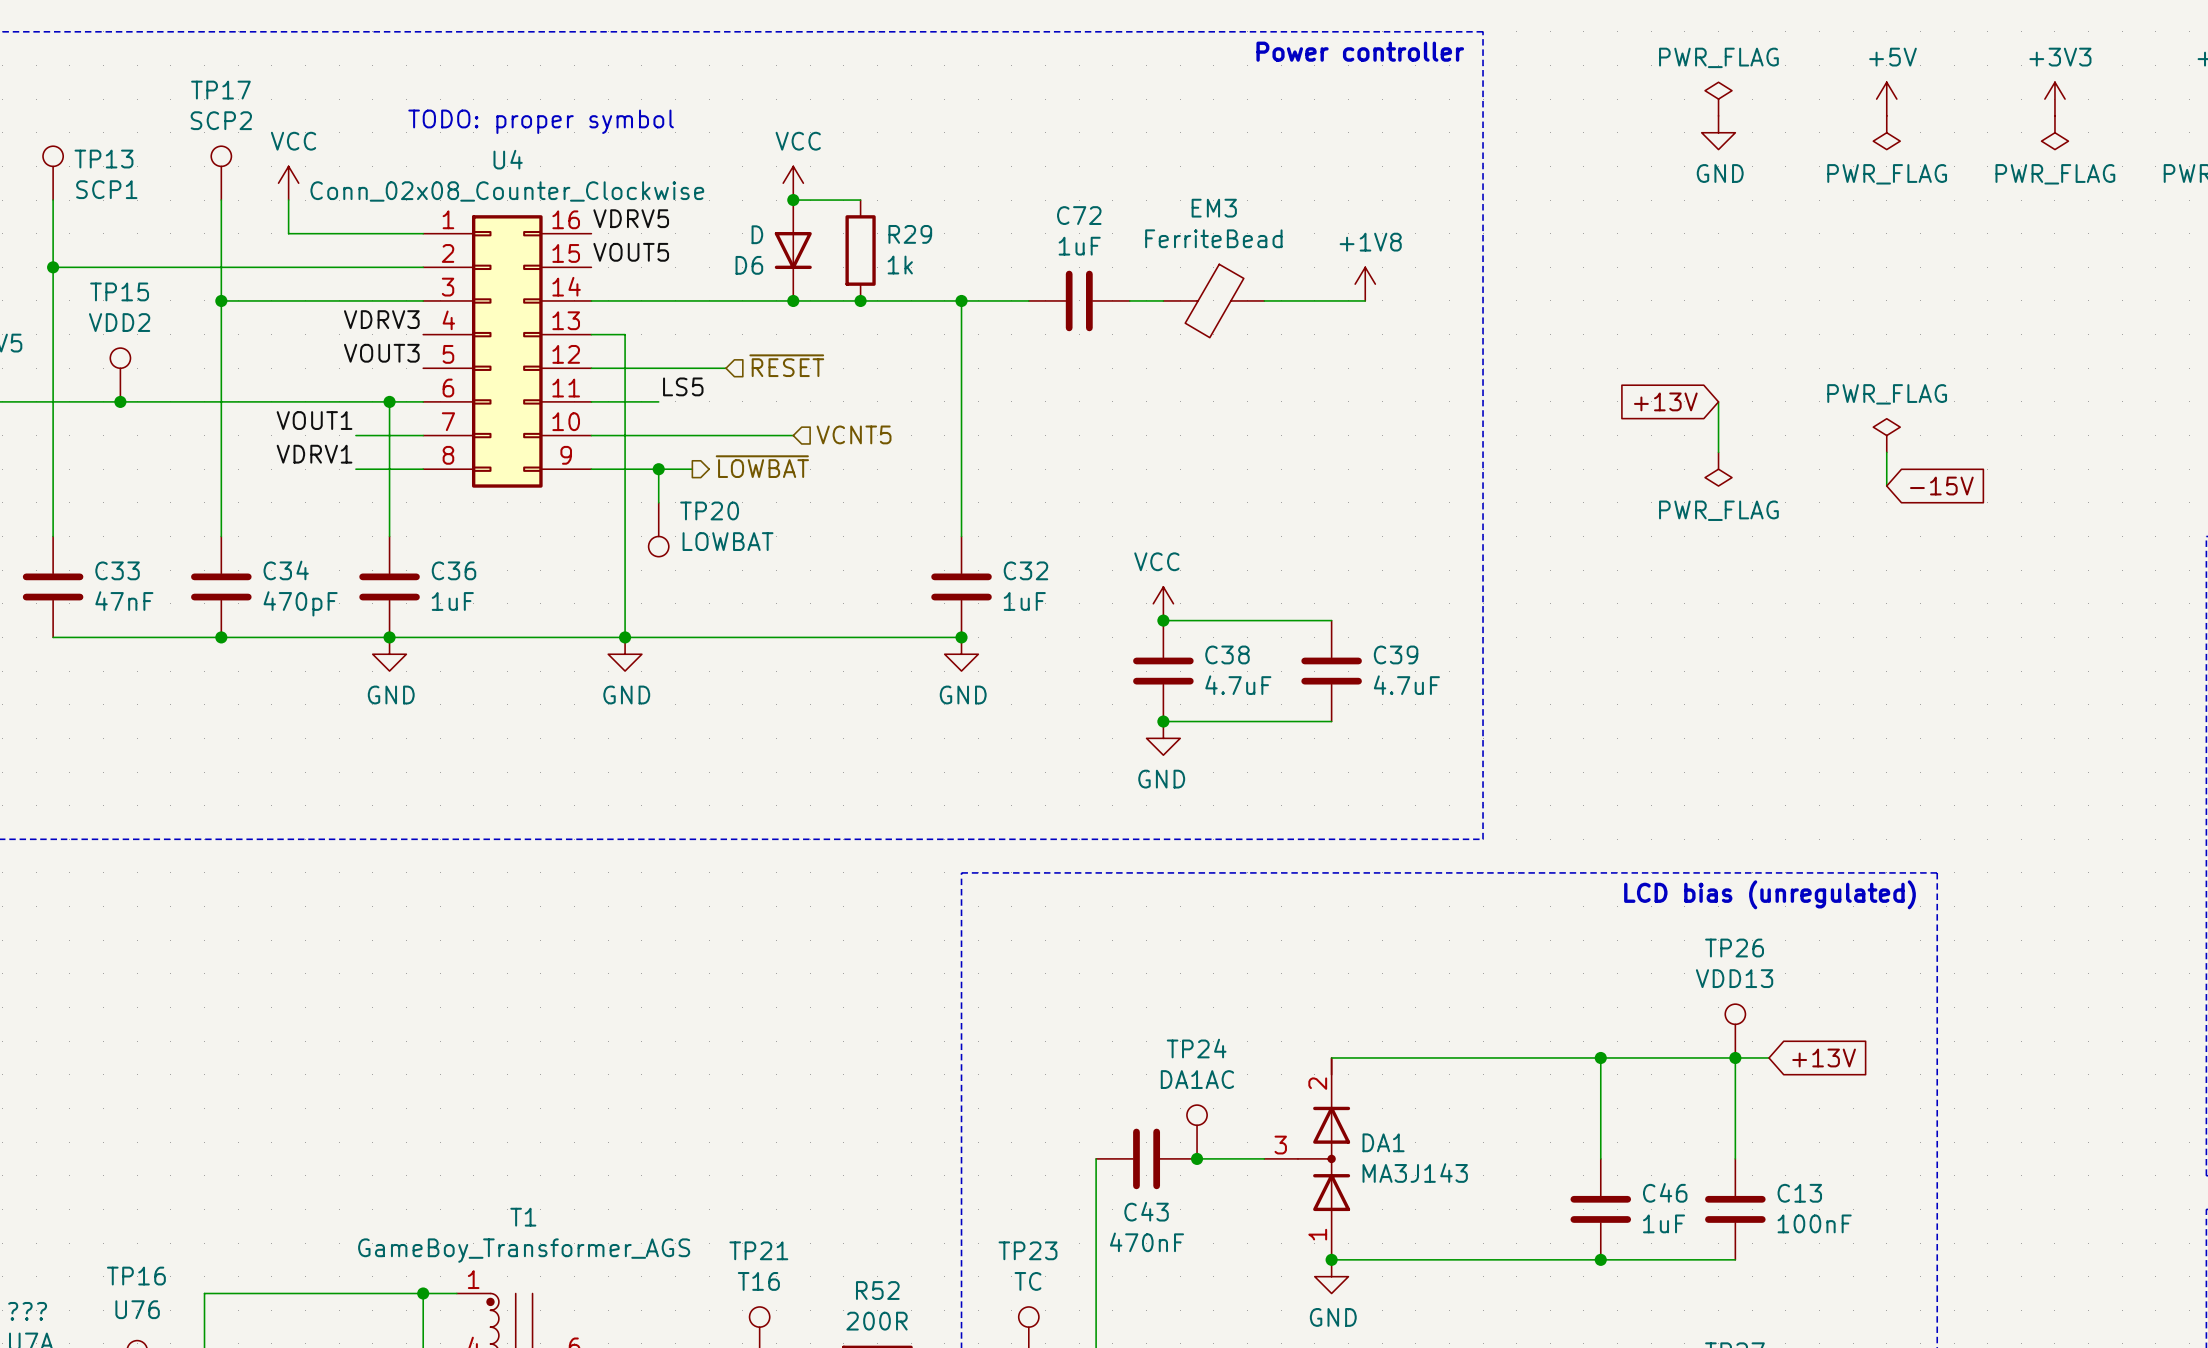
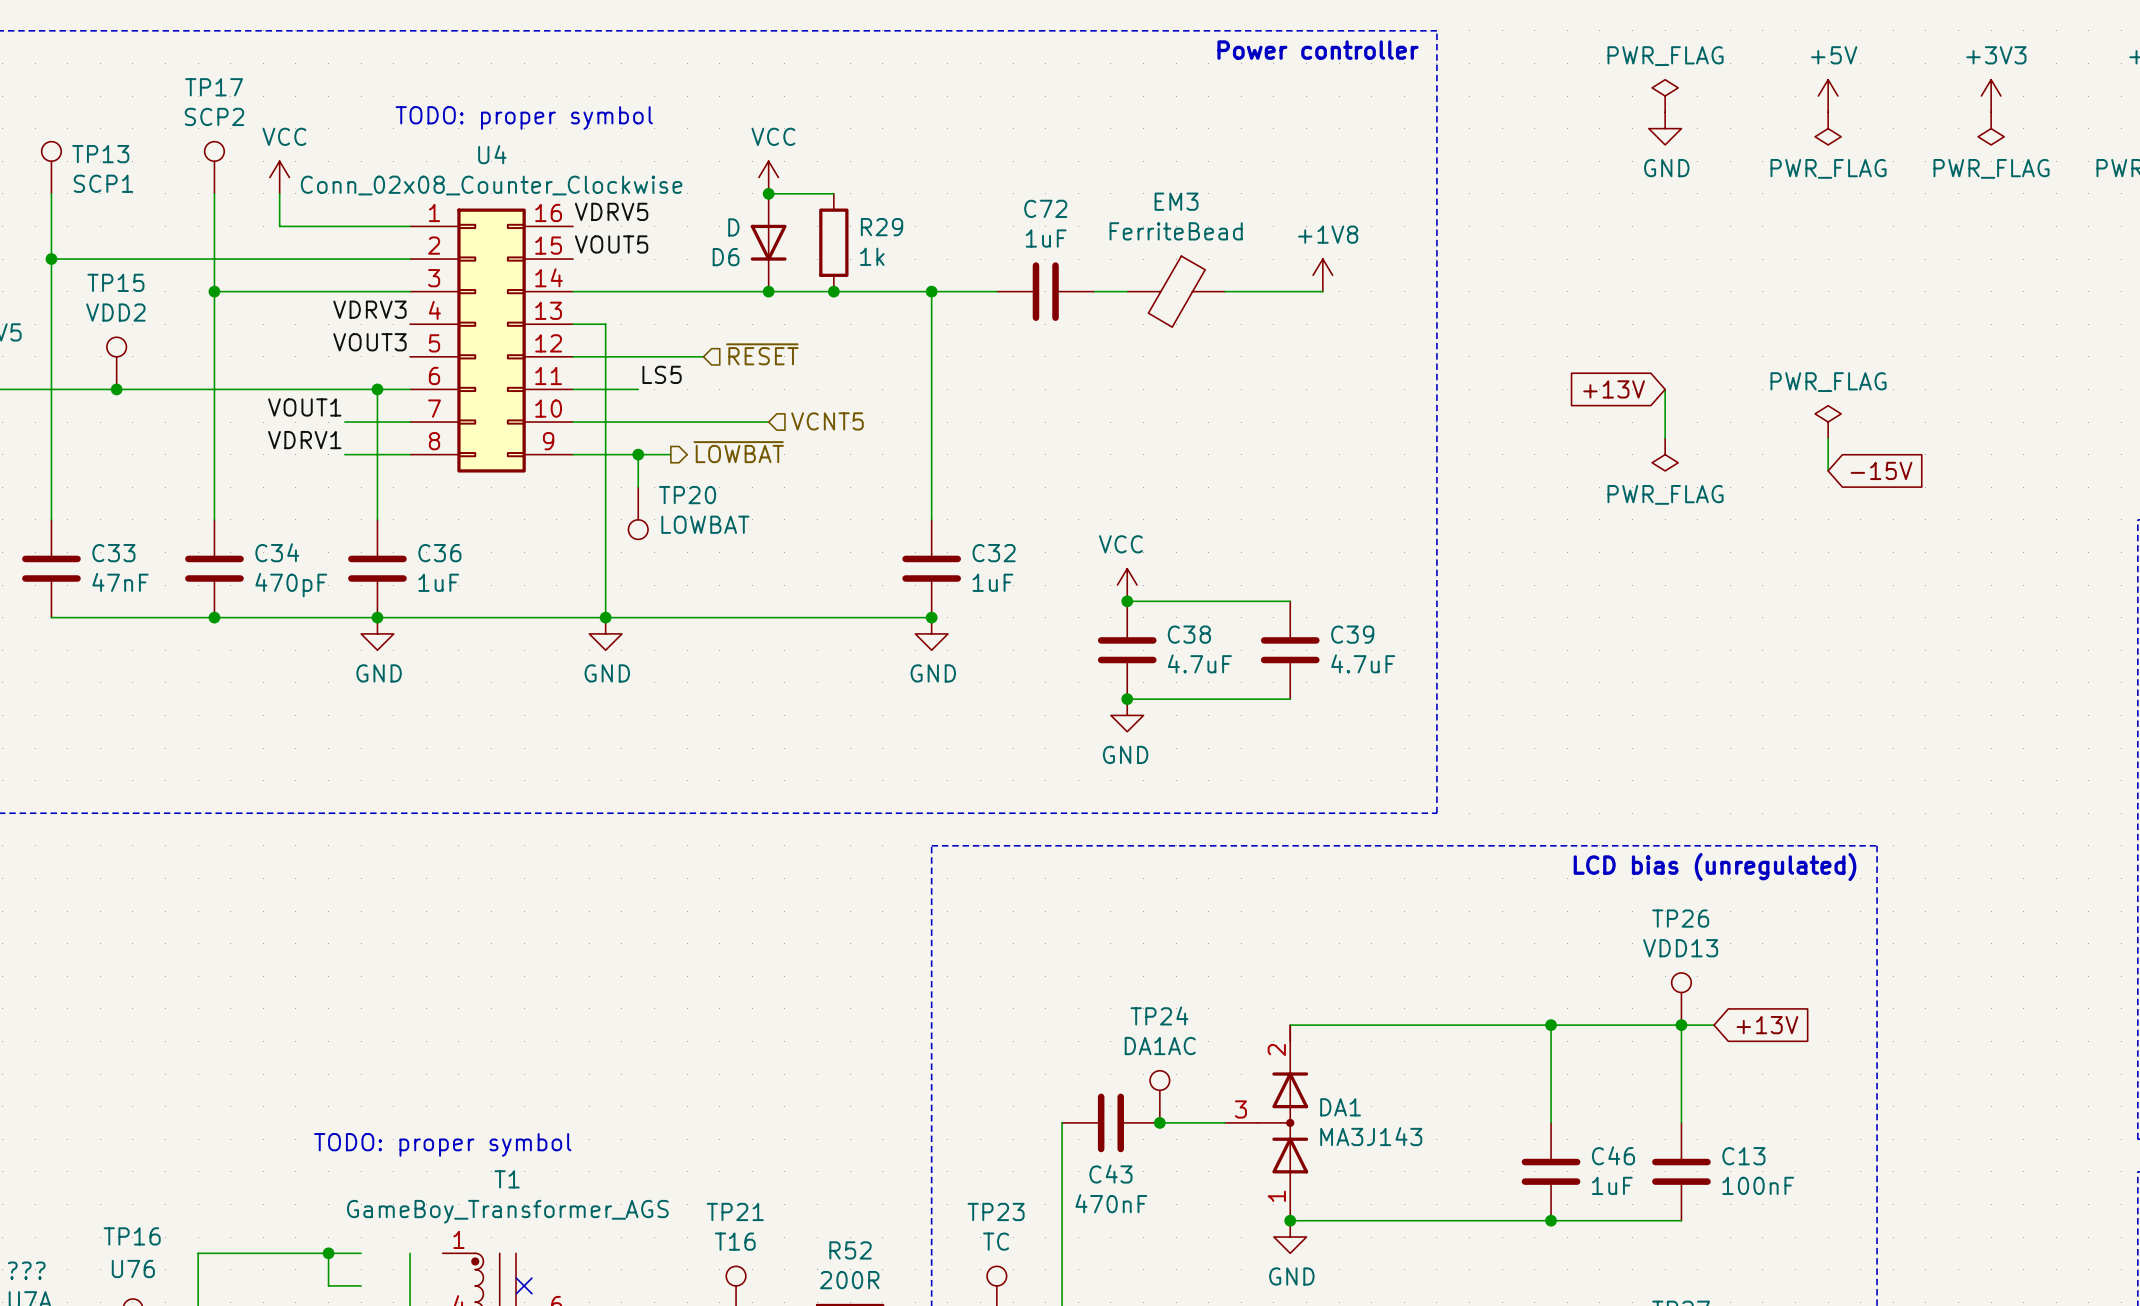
text: none -> TODO: proper symbol (442, 1144)
wire: none -> (328, 1253) (328, 1285) (361, 1285)
junction: none -> (328, 1253)
wire: (372, 1293) (456, 1293) -> none
junction: (423, 1293) -> none
no-connect mark: none -> (524, 1285)

